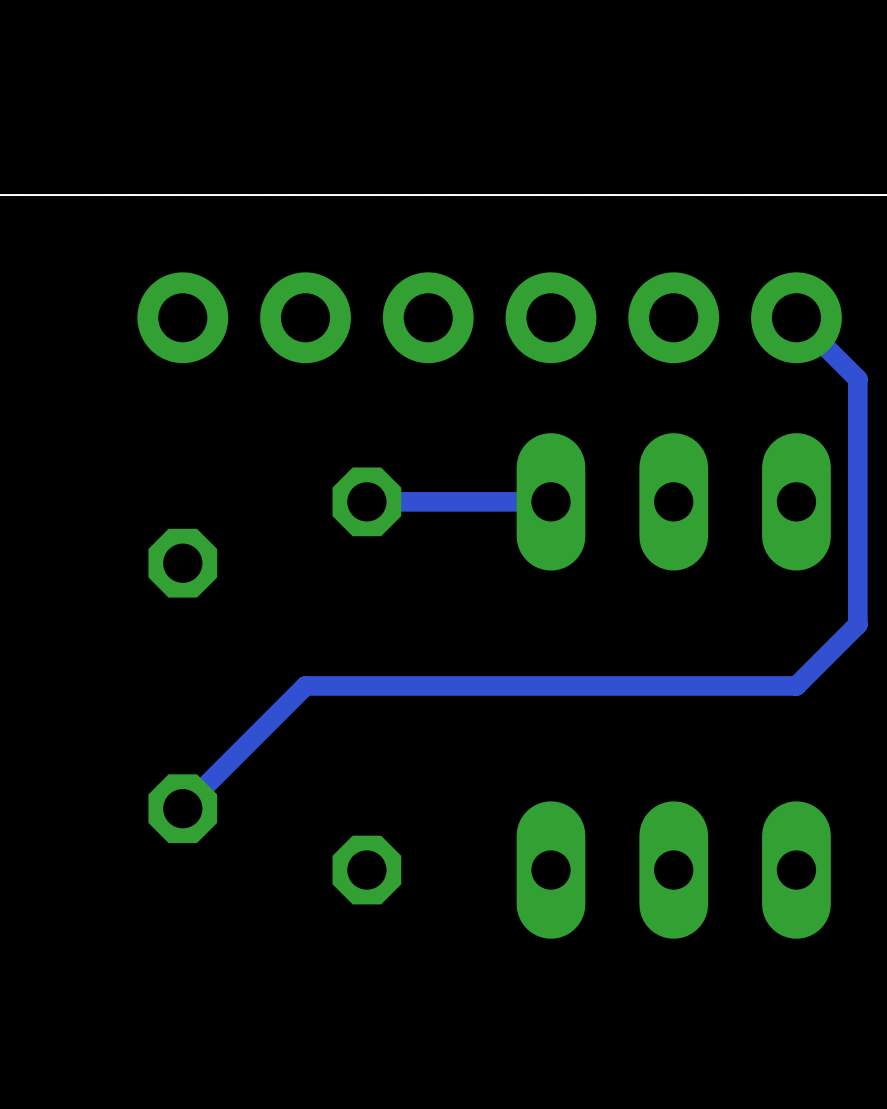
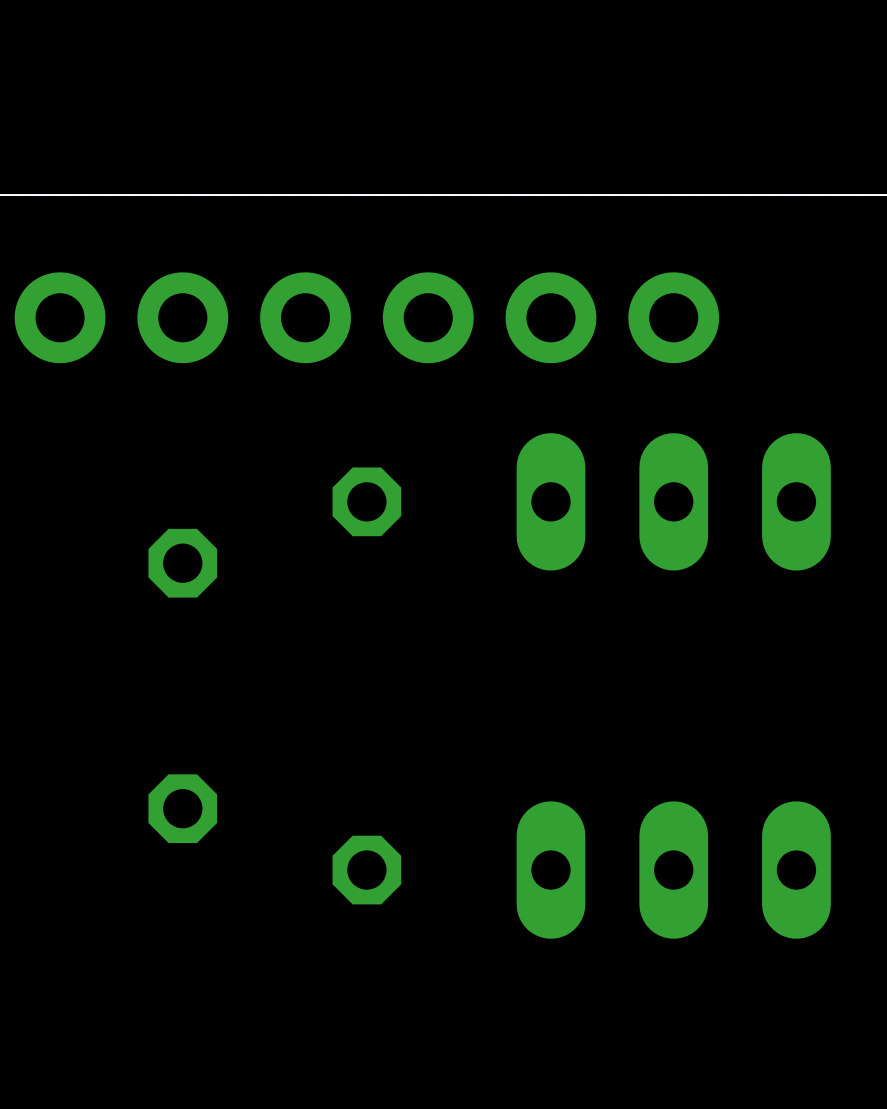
part position: (489, 317) -> (366, 317)
track: (796, 317) (857, 379) (857, 624) (796, 685) (305, 685) (182, 808) -> none
track: (550, 501) (366, 501) -> none

